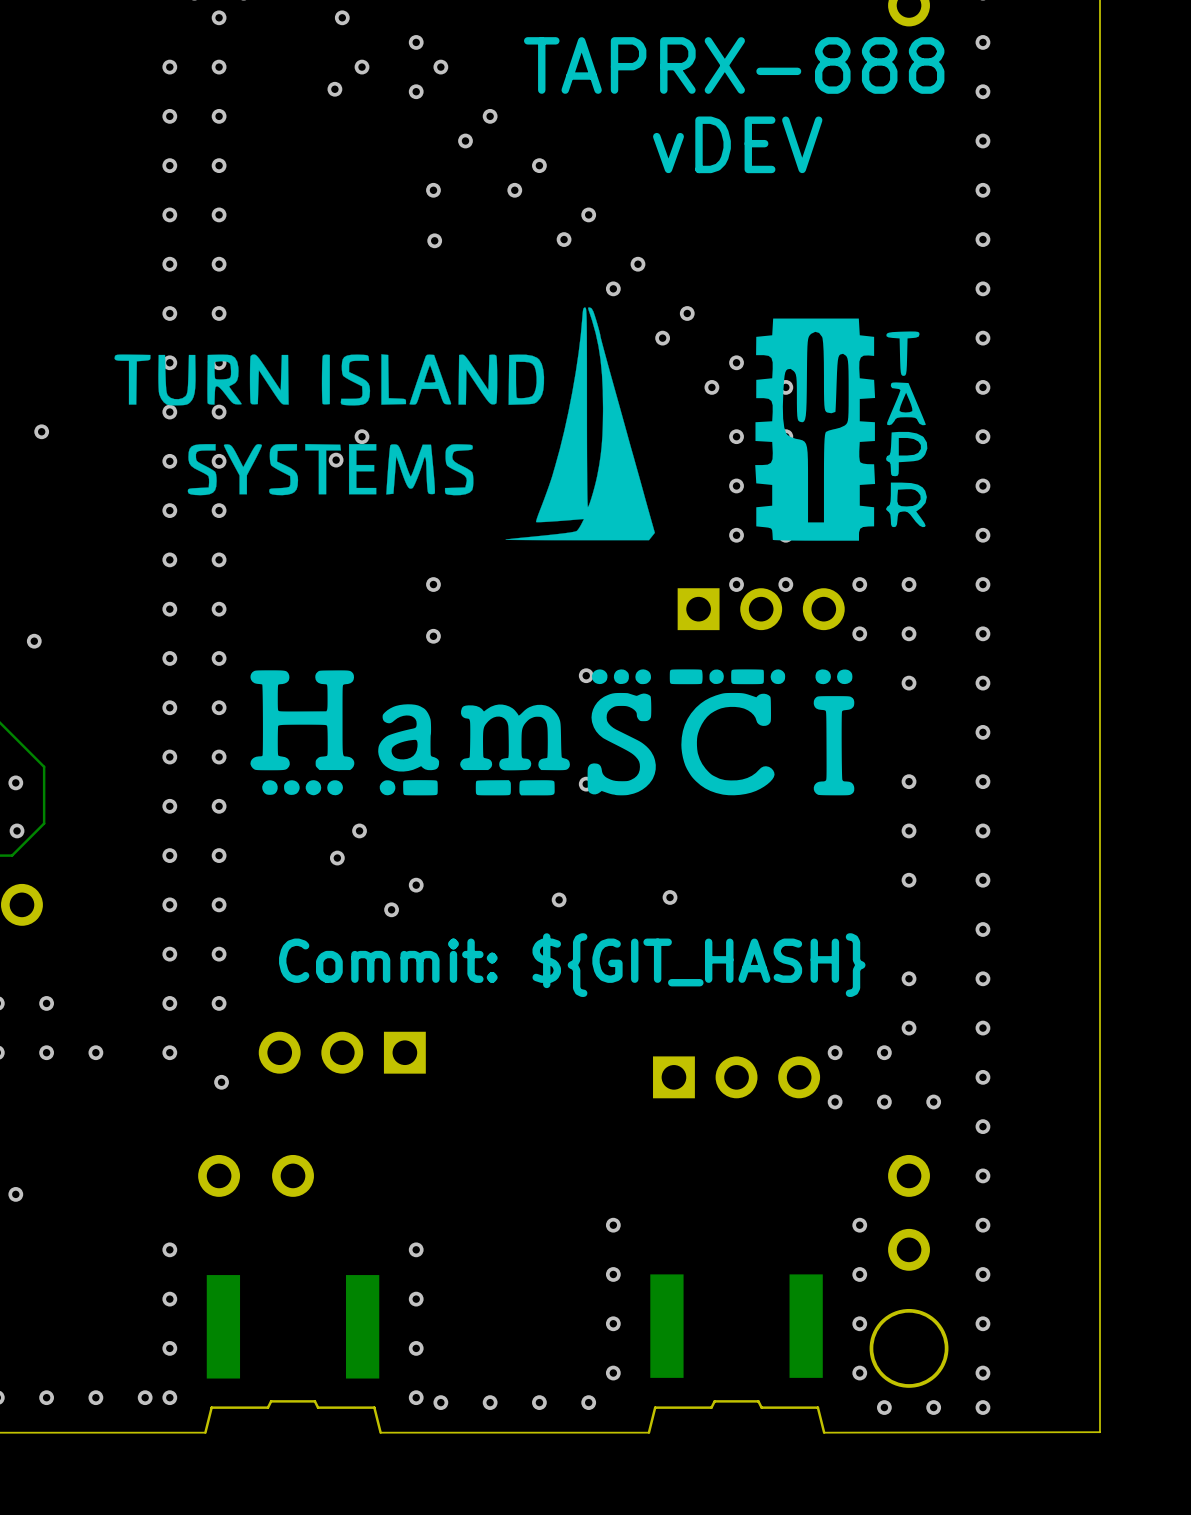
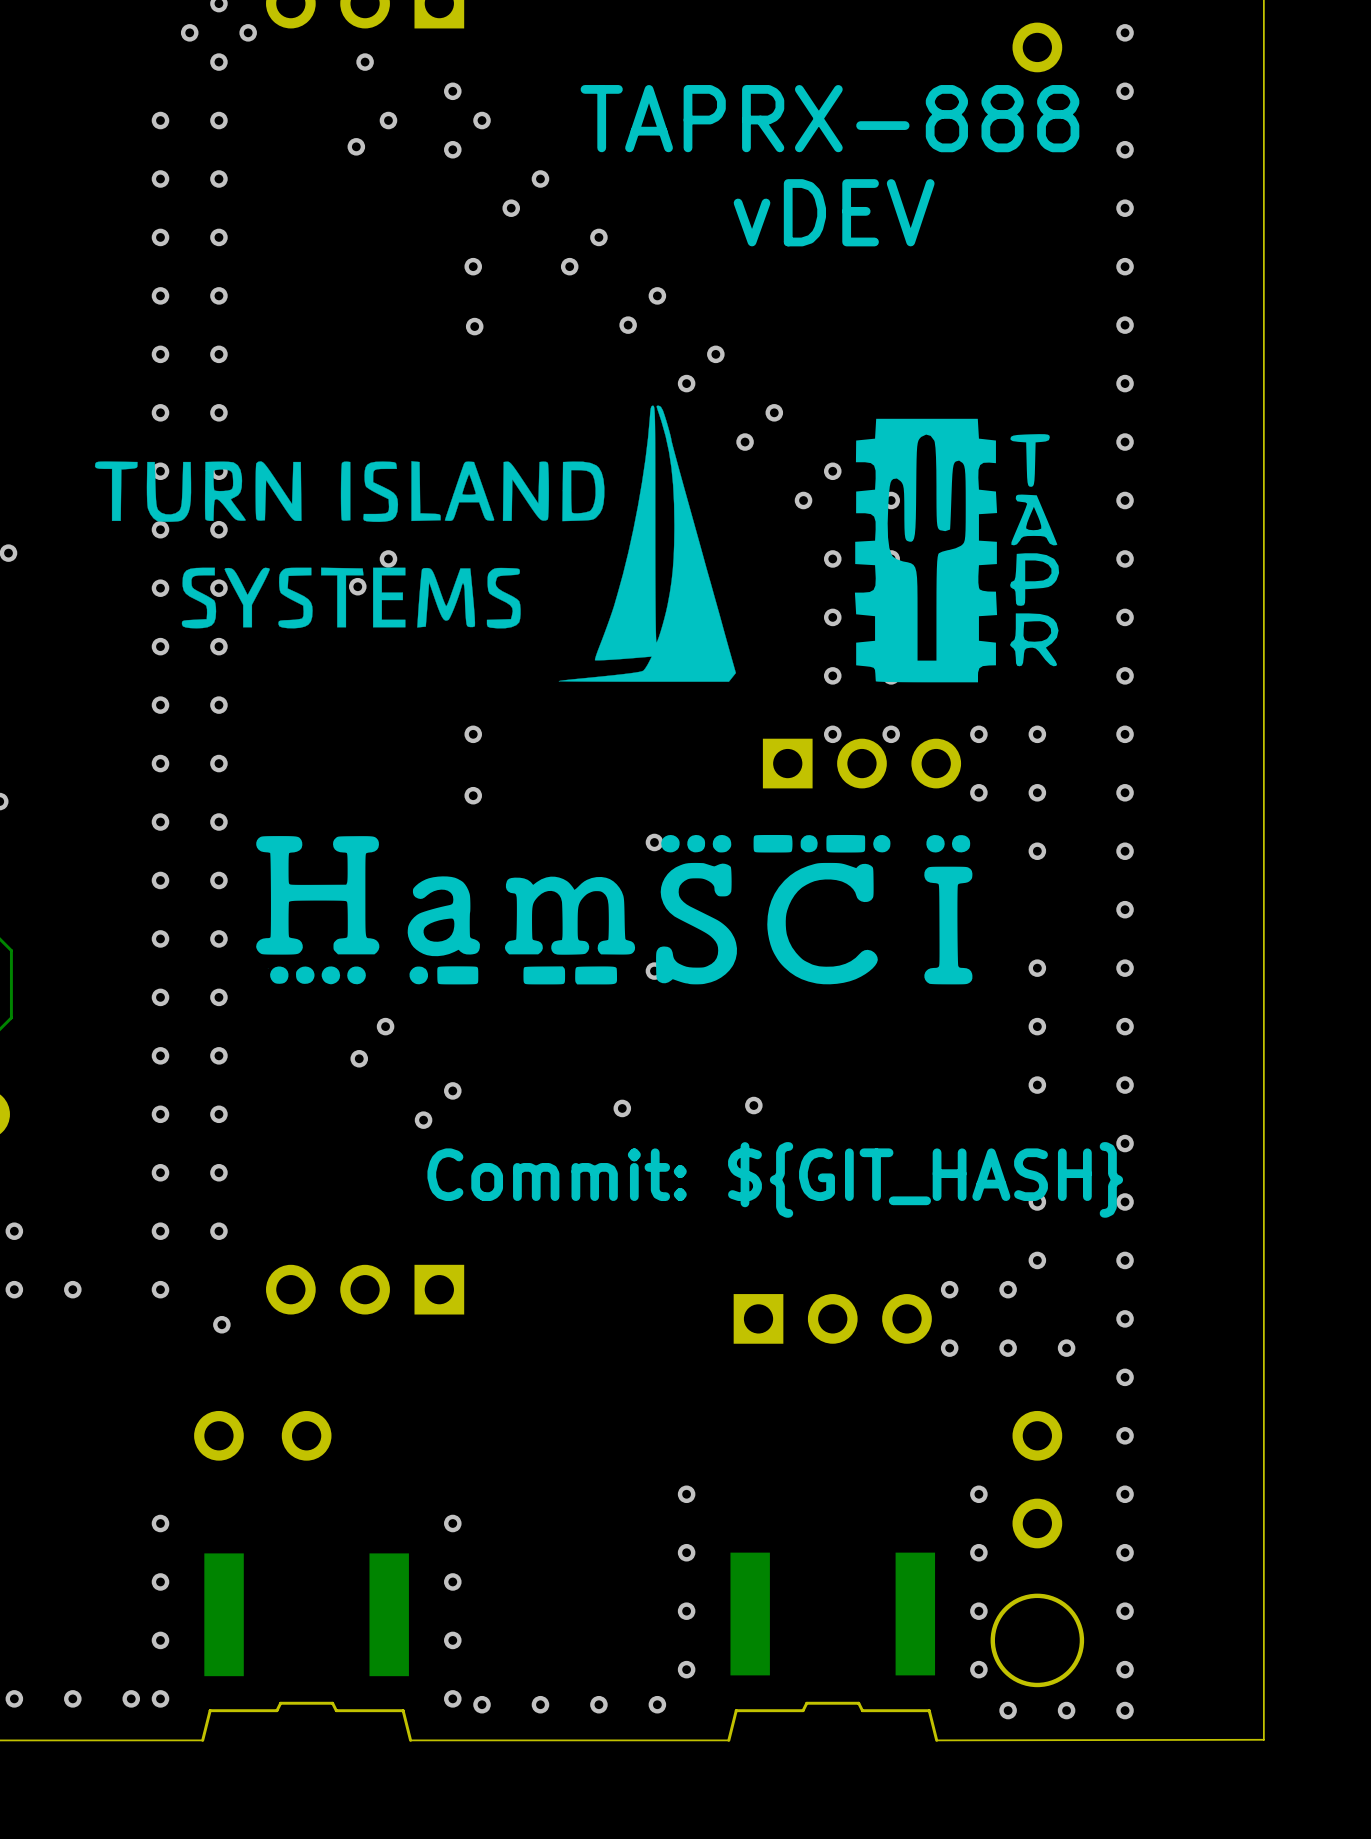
text position: Commit: ${GIT_HASH} (572, 965) -> Commit: ${GIT_HASH} (775, 1179)

